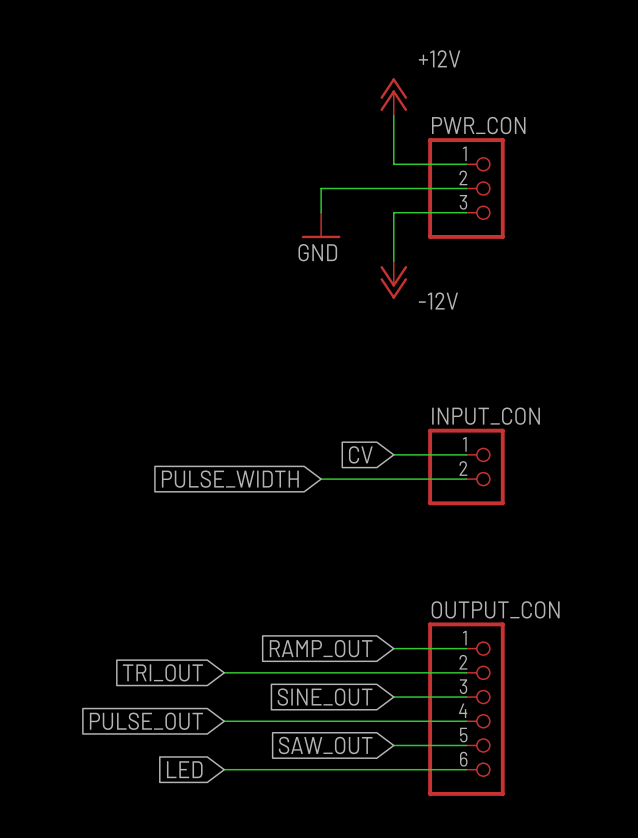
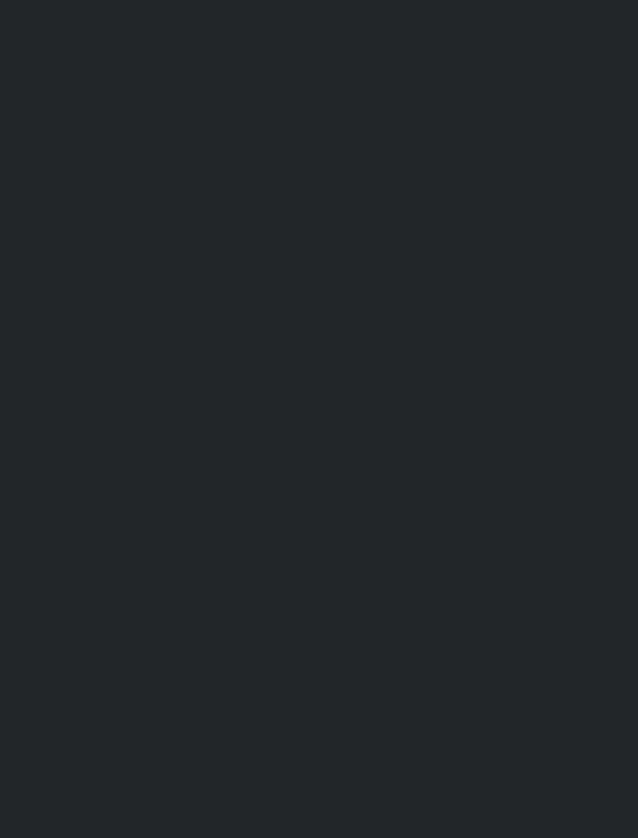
power symbol: +12V (393, 97) -> none
wire: (393, 115) (393, 164) (466, 164) -> none
wire: (466, 188) (321, 188) (321, 212) -> none
PWR_CON: (466, 188) -> none
wire: (466, 212) (393, 212) (393, 261) -> none
power symbol: GND (321, 225) -> none
power symbol: -12V (393, 279) -> none
global label: CV (360, 454) -> none
wire: (393, 454) (466, 454) -> none
INPUT_CON: (466, 466) -> none
global label: PULSE_WIDTH (230, 479) -> none
wire: (321, 479) (466, 479) -> none
global label: RAMP_OUT (321, 648) -> none
wire: (393, 648) (466, 648) -> none
global label: TRI_OUT (162, 672) -> none
wire: (224, 672) (466, 672) -> none
global label: SINE_OUT (325, 697) -> none
wire: (393, 697) (466, 697) -> none
OUTPUT_CON: (466, 709) -> none
global label: PULSE_OUT (146, 721) -> none
wire: (224, 721) (466, 721) -> none
global label: SAW_OUT (325, 745) -> none
wire: (393, 745) (466, 745) -> none
global label: LED (184, 769) -> none
wire: (224, 769) (466, 769) -> none

